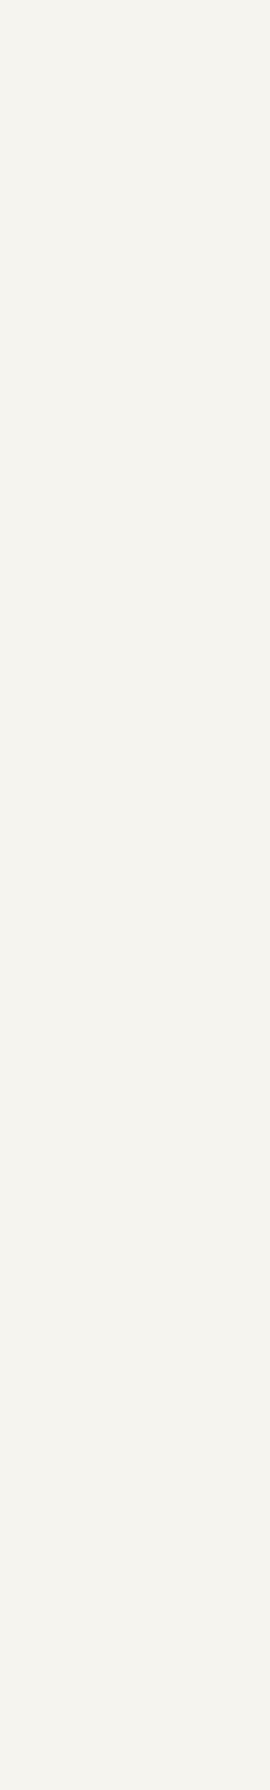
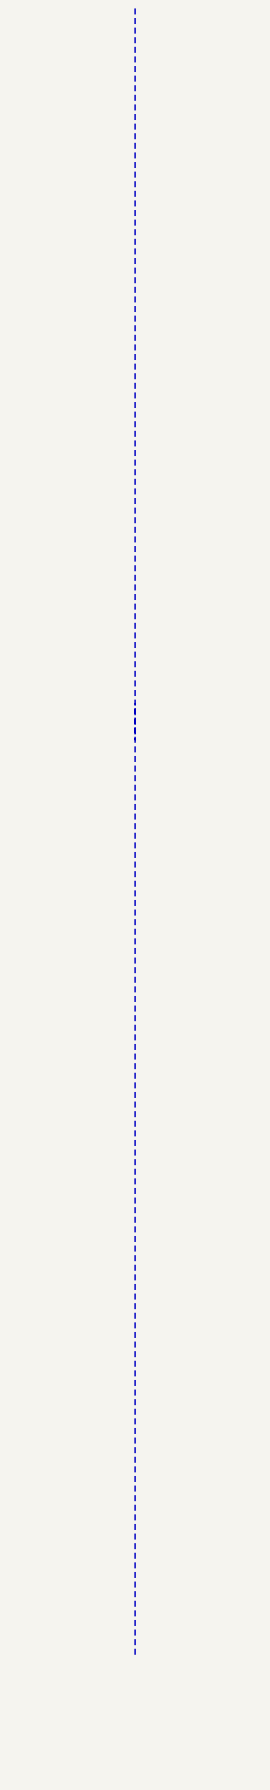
line: none -> (135, 8) (135, 1654)

